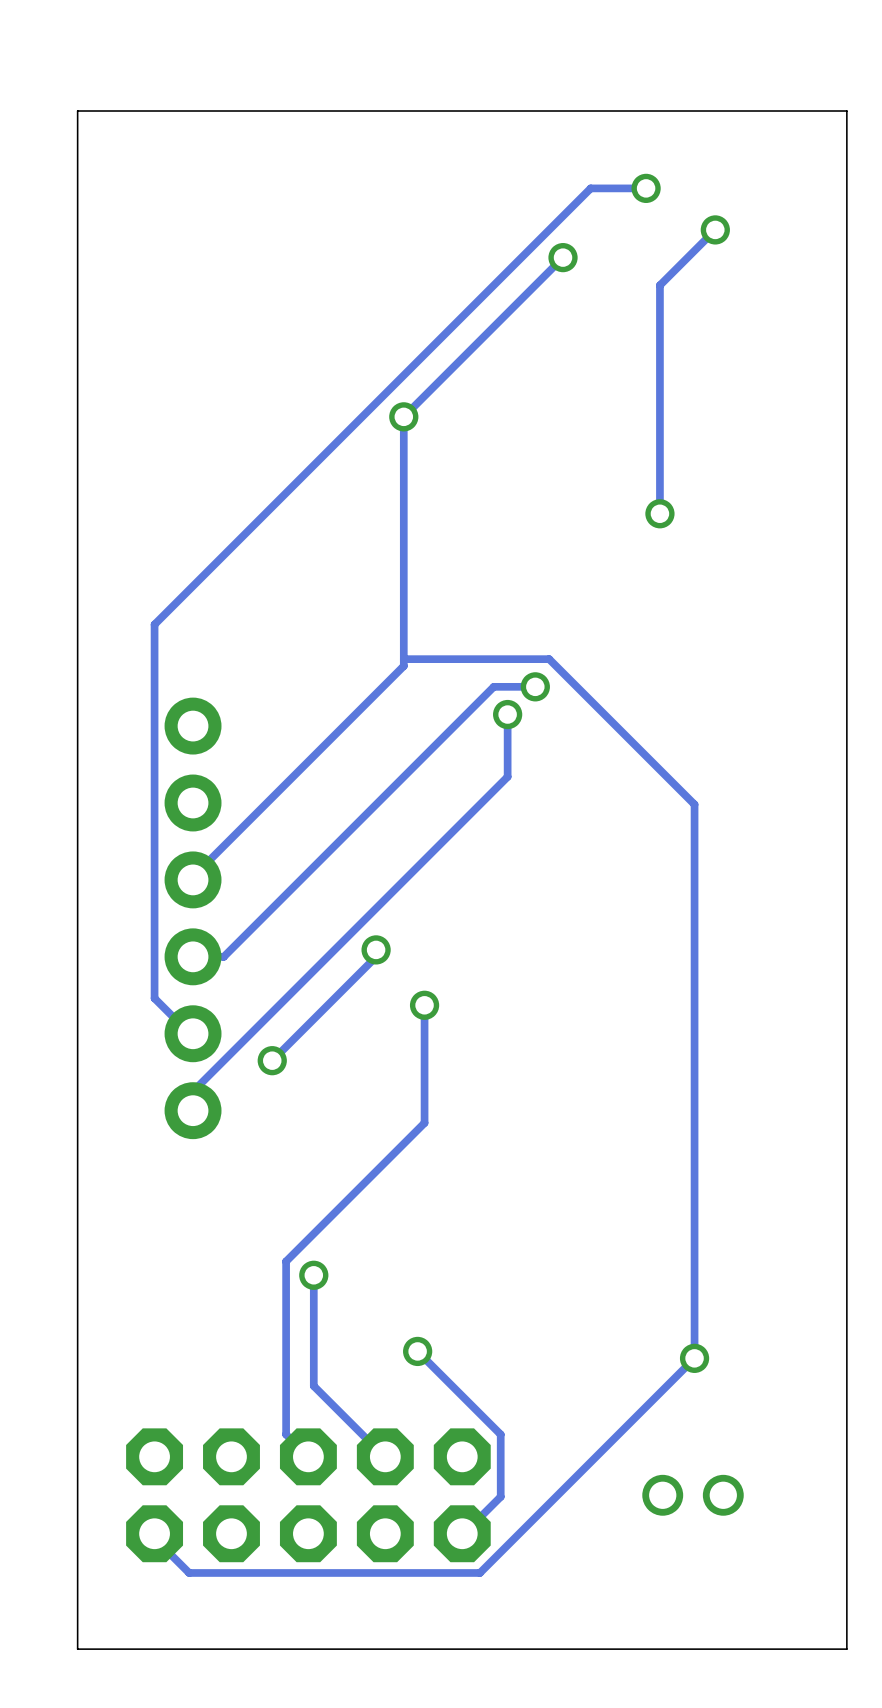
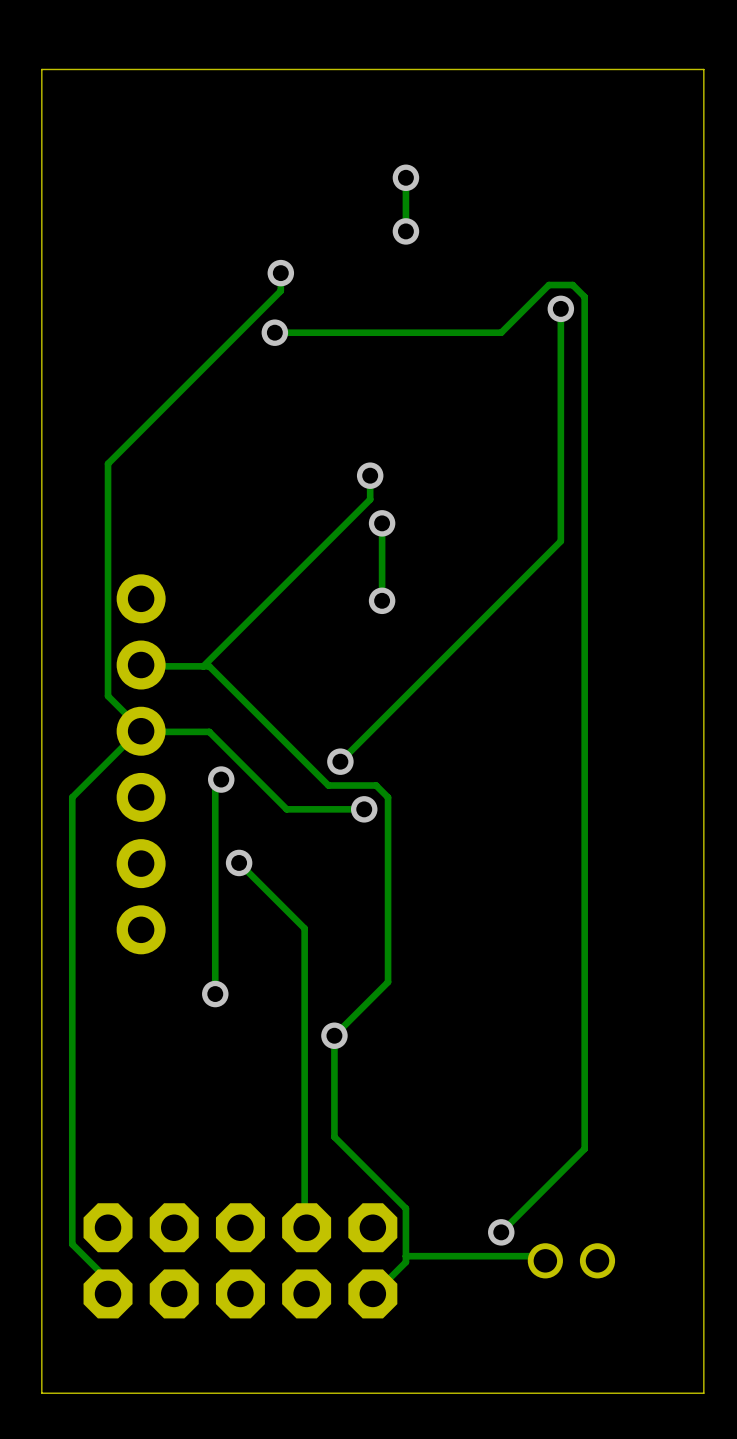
track: (646, 188) (590, 188) (154, 624) -> (280, 273) (280, 290) (108, 463) (108, 511)
via: (646, 188) -> none
track: (715, 229) (659, 285) (659, 513) -> none
via: (715, 229) -> none
track: none -> (405, 177) (405, 231)
via: none -> (405, 177)
track: (563, 257) (403, 416) (403, 666) -> (370, 475) (370, 499) (322, 547)
via: (563, 257) -> none
via: none -> (405, 231)
via: none -> (280, 273)
track: none -> (560, 308) (560, 541) (340, 761)
via: none -> (560, 308)
track: none -> (274, 332) (501, 332) (548, 285) (572, 285) (584, 296) (584, 1148) (501, 1232)
via: none -> (274, 332)
via: (403, 416) -> none
via: (659, 513) -> none
via: none -> (370, 475)
track: none -> (382, 523) (382, 600)
via: none -> (382, 523)
track: (403, 659) (549, 659) (694, 804) (694, 1358) (479, 1572) (189, 1572) (154, 1538) (154, 1533) -> (141, 731) (137, 731) (72, 797) (72, 1244) (108, 1280) (108, 1293)
track: (535, 686) (493, 686) (223, 956) (193, 956) -> none
via: (535, 686) -> none
track: (507, 714) (507, 776) (196, 1088) (196, 1109) (193, 1110) -> none
via: (507, 714) -> none
via: none -> (382, 600)
track: none -> (141, 665) (209, 666) (328, 785) (376, 785) (388, 797) (388, 982) (334, 1035) (334, 1137)
track: (265, 804) (196, 873) (193, 879) -> (108, 696) (141, 731)
track: (154, 839) (154, 998) (189, 1032) (193, 1033) -> none
track: none -> (141, 731) (209, 731) (286, 809) (364, 809)
via: none -> (340, 761)
track: none -> (221, 779) (215, 785) (215, 994)
via: none -> (221, 779)
track: (376, 949) (376, 956) (272, 1060) -> none
via: (376, 949) -> none
via: none -> (364, 809)
track: (424, 1005) (424, 1122) (286, 1261) (286, 1434) (308, 1456) -> none
via: (424, 1005) -> none
via: none -> (239, 862)
via: (272, 1060) -> none
via: none -> (215, 994)
via: none -> (334, 1035)
track: (313, 1275) (313, 1386) (383, 1455) -> (239, 862) (304, 928) (304, 1226)
via: (313, 1275) -> none
via: (417, 1351) -> none
via: (694, 1358) -> none
via: none -> (501, 1232)
track: none -> (405, 1256) (542, 1256) (545, 1260)

